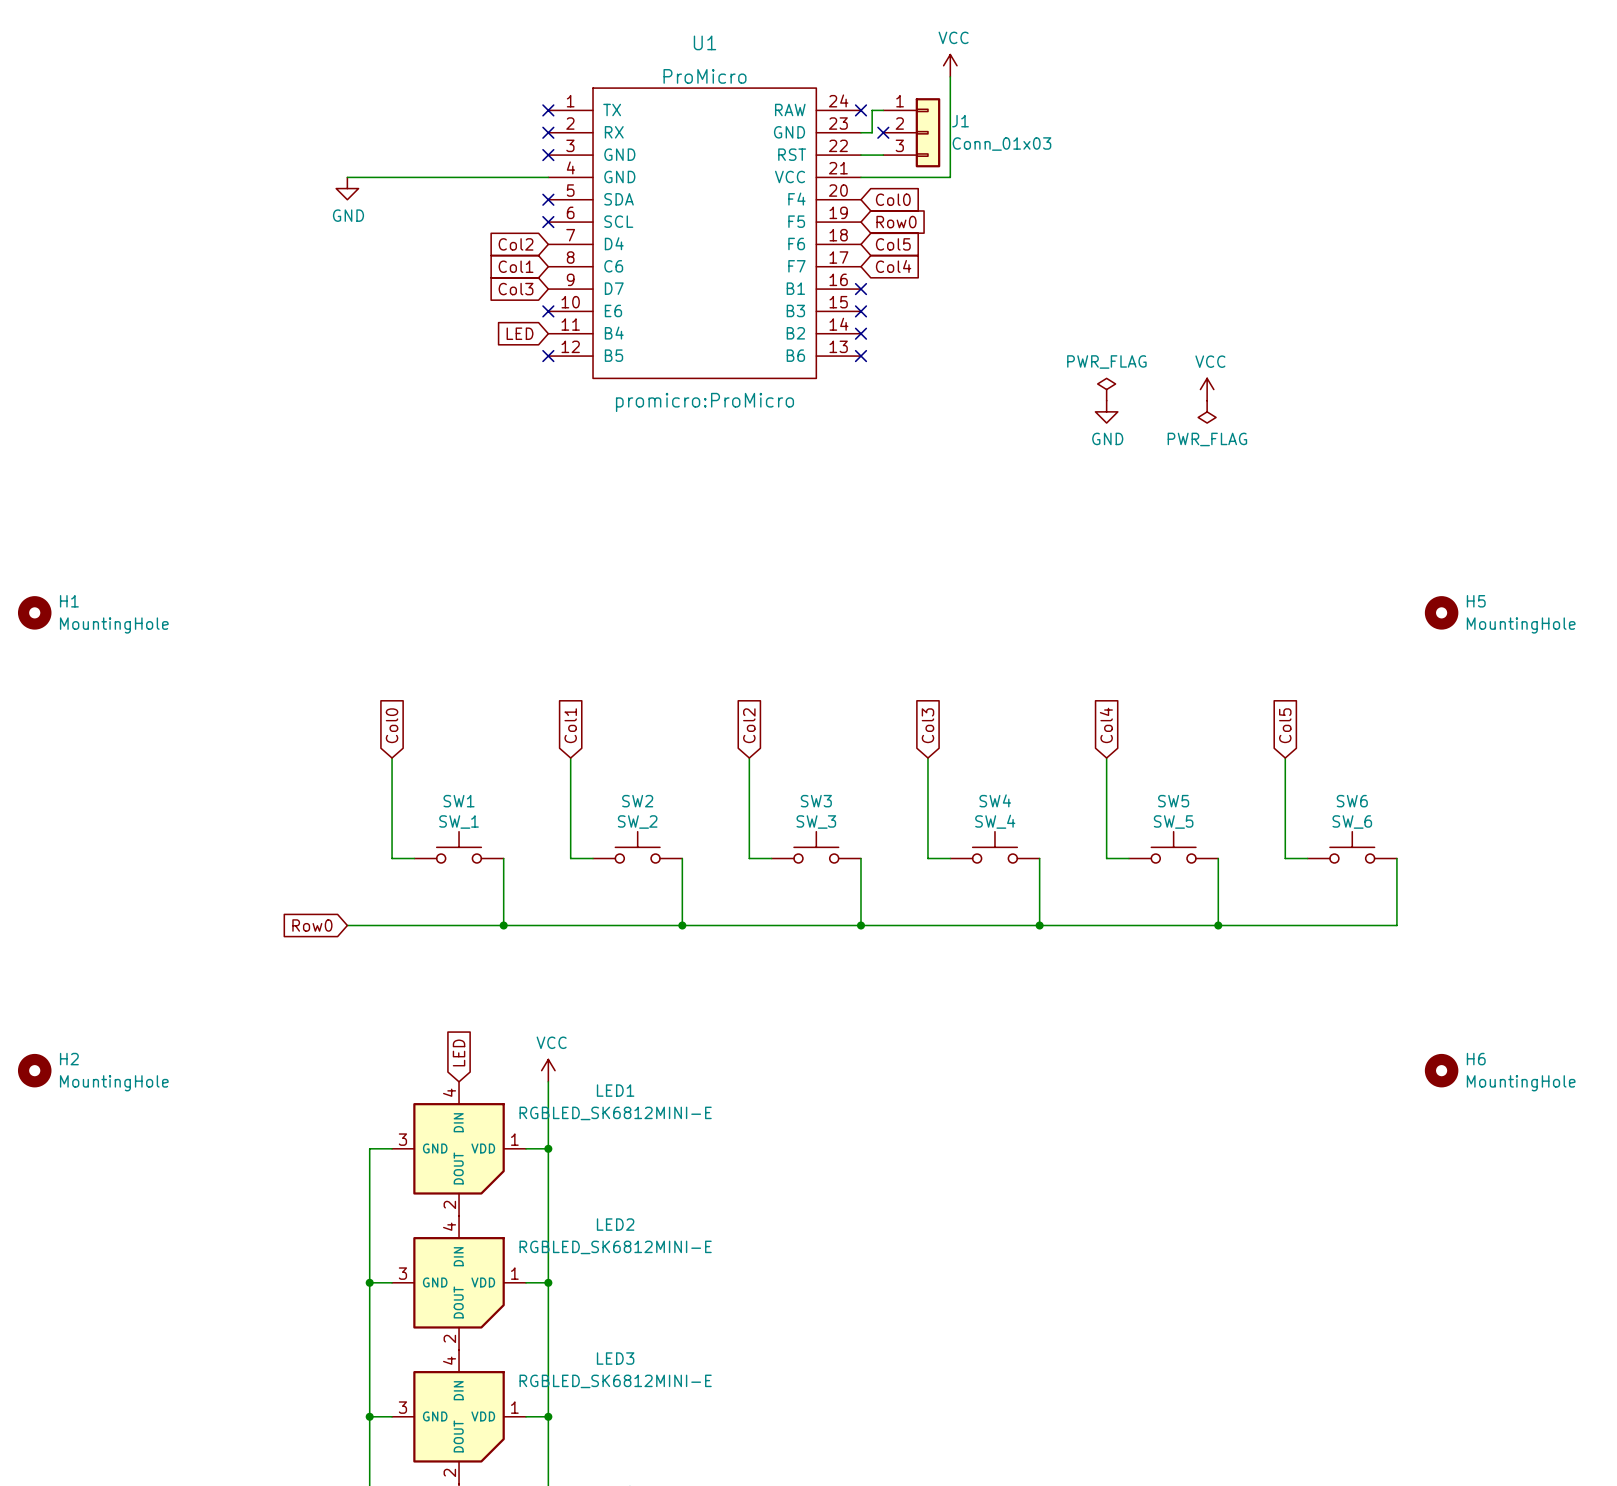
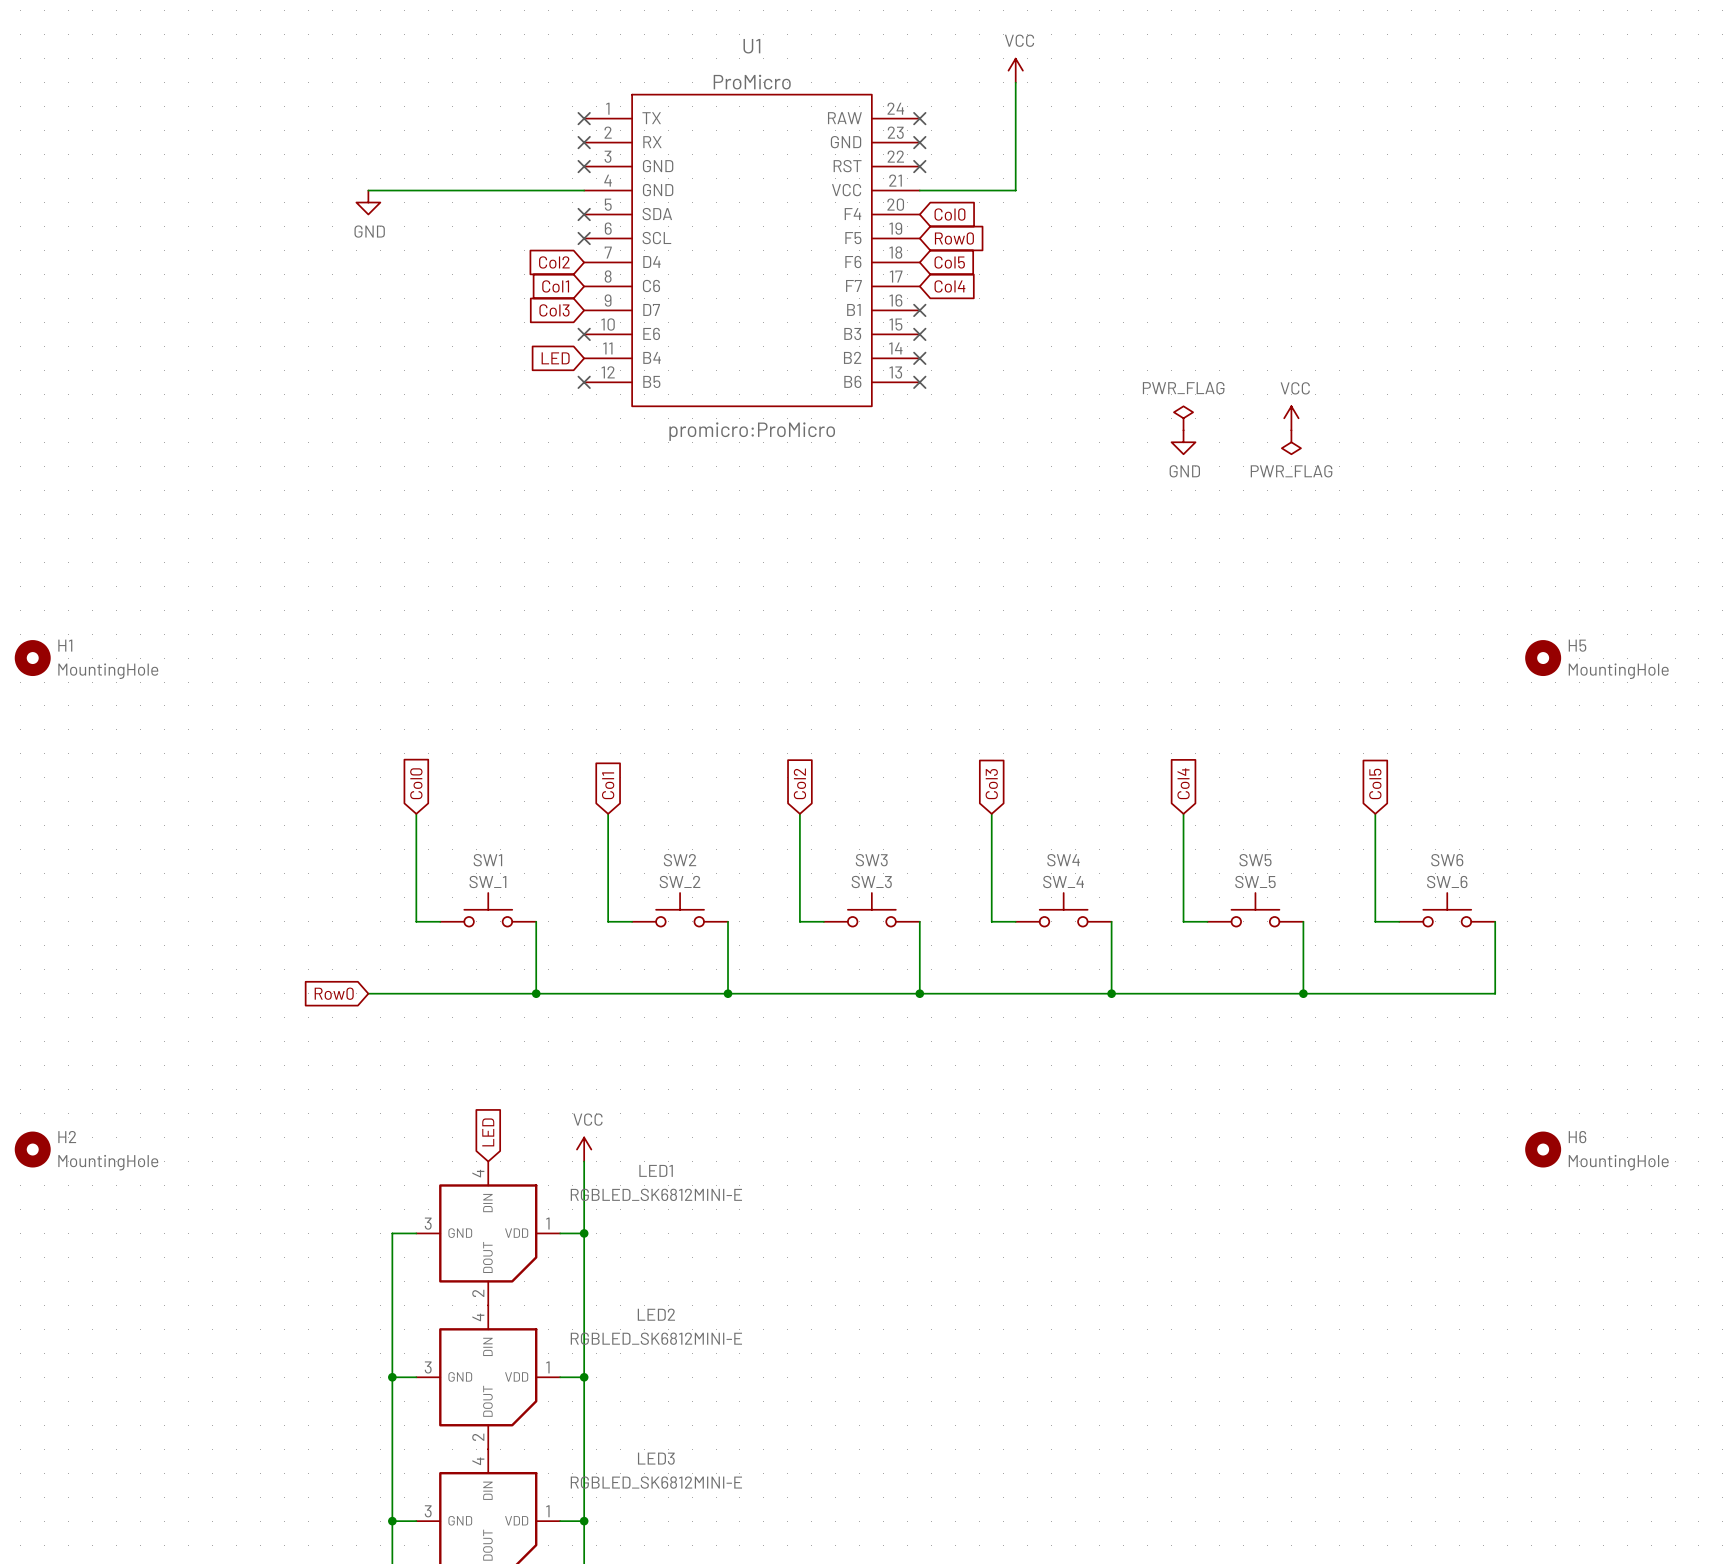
wire: (883, 110) (872, 110) (872, 132) (860, 132) -> none
no-connect mark: none -> (919, 142)
no-connect mark: (883, 132) -> none
J1: Conn_01x03 (911, 132) -> none
wire: (860, 155) (883, 155) -> none
no-connect mark: none -> (919, 166)

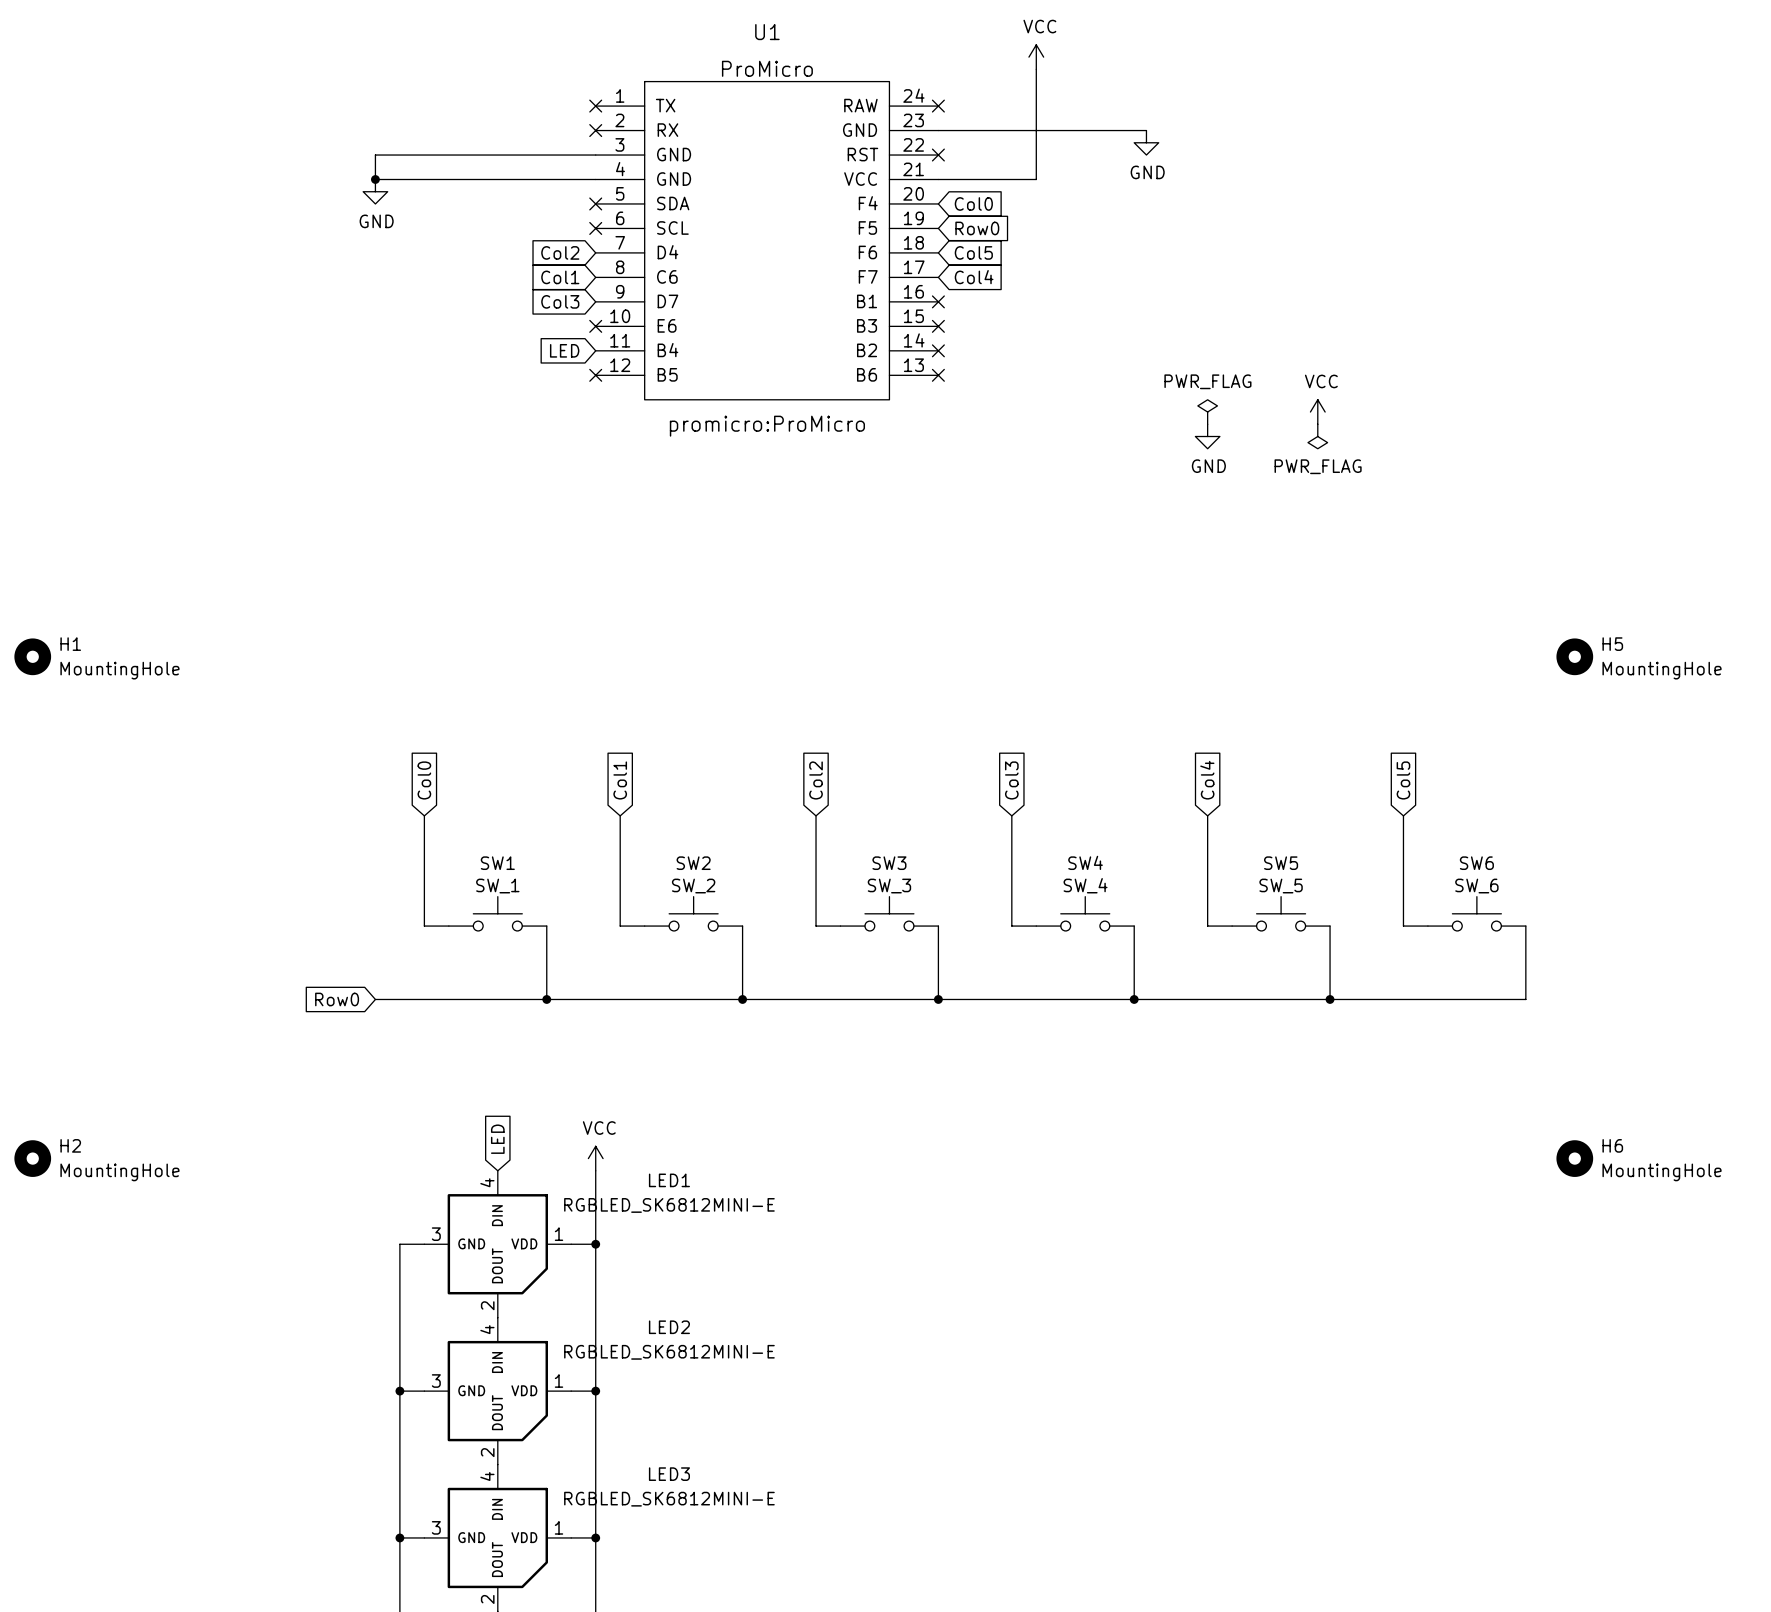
wire: none -> (938, 130) (1146, 130)
no-connect mark: (919, 142) -> none
power symbol: none -> GND (1146, 142)
wire: none -> (595, 155) (375, 155) (375, 179)
no-connect mark: (584, 166) -> none
junction: none -> (375, 179)

